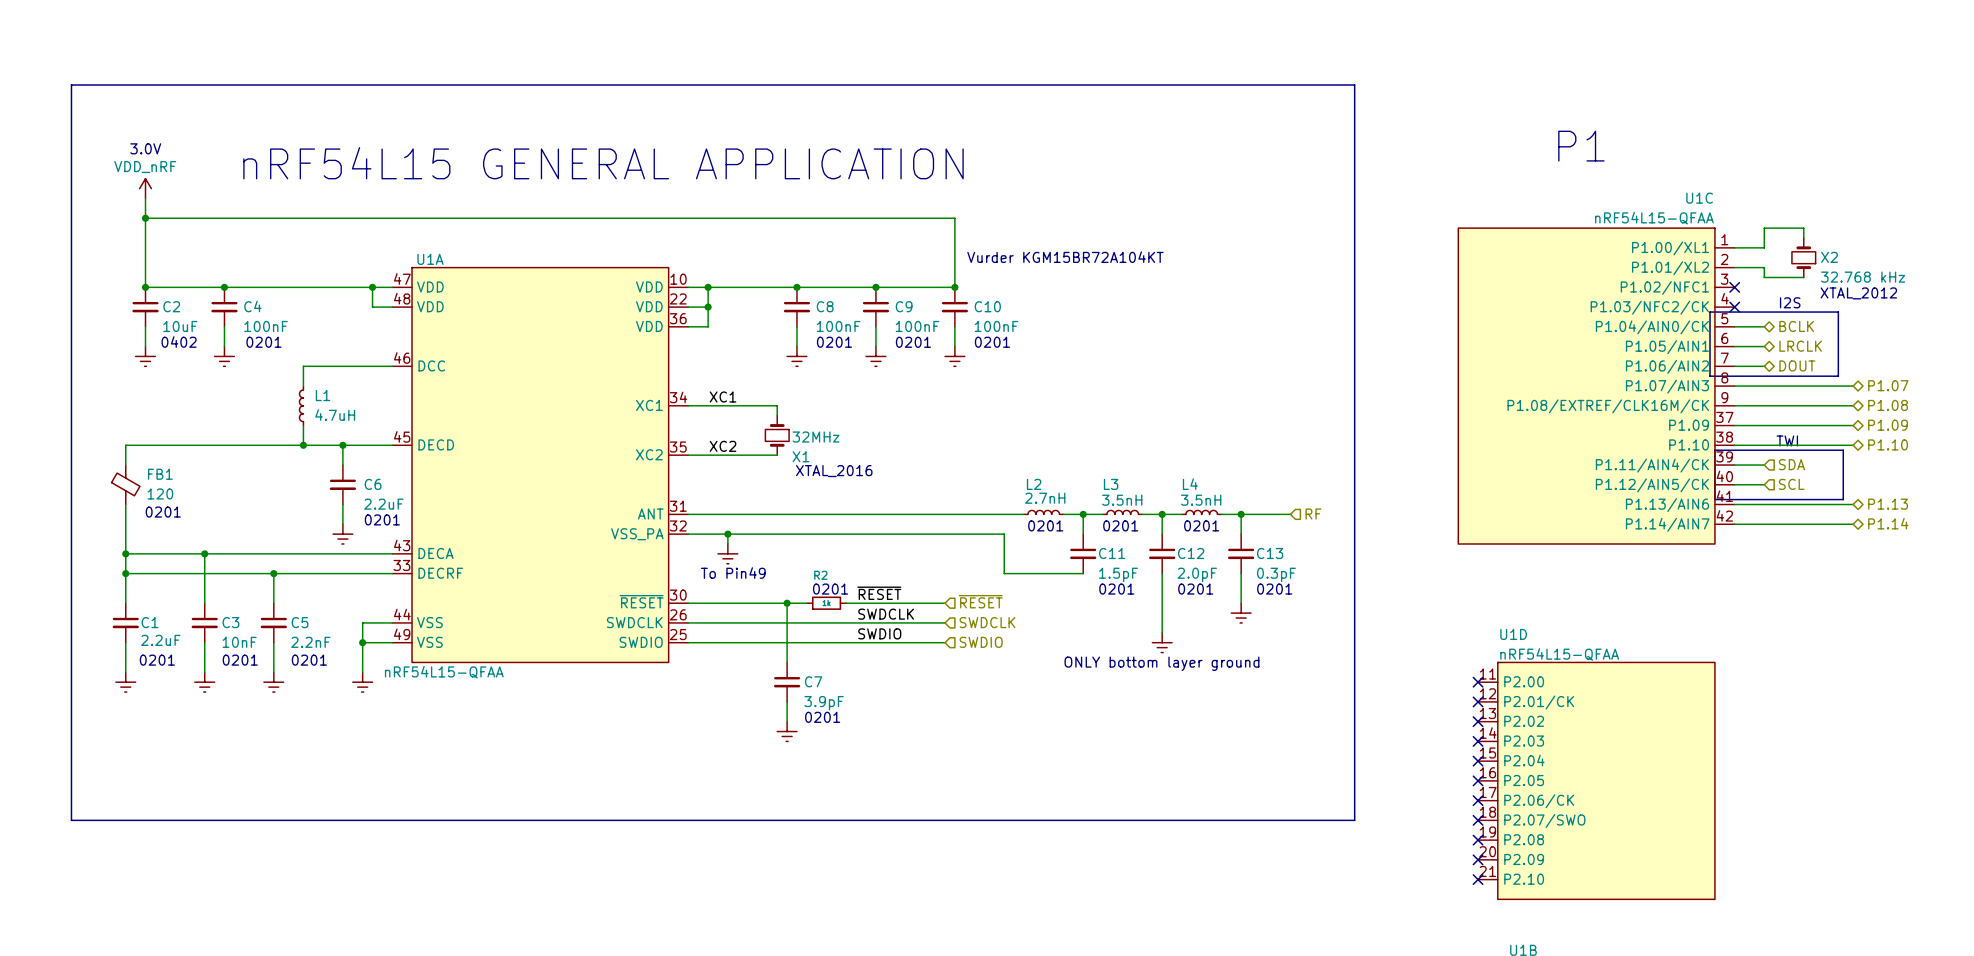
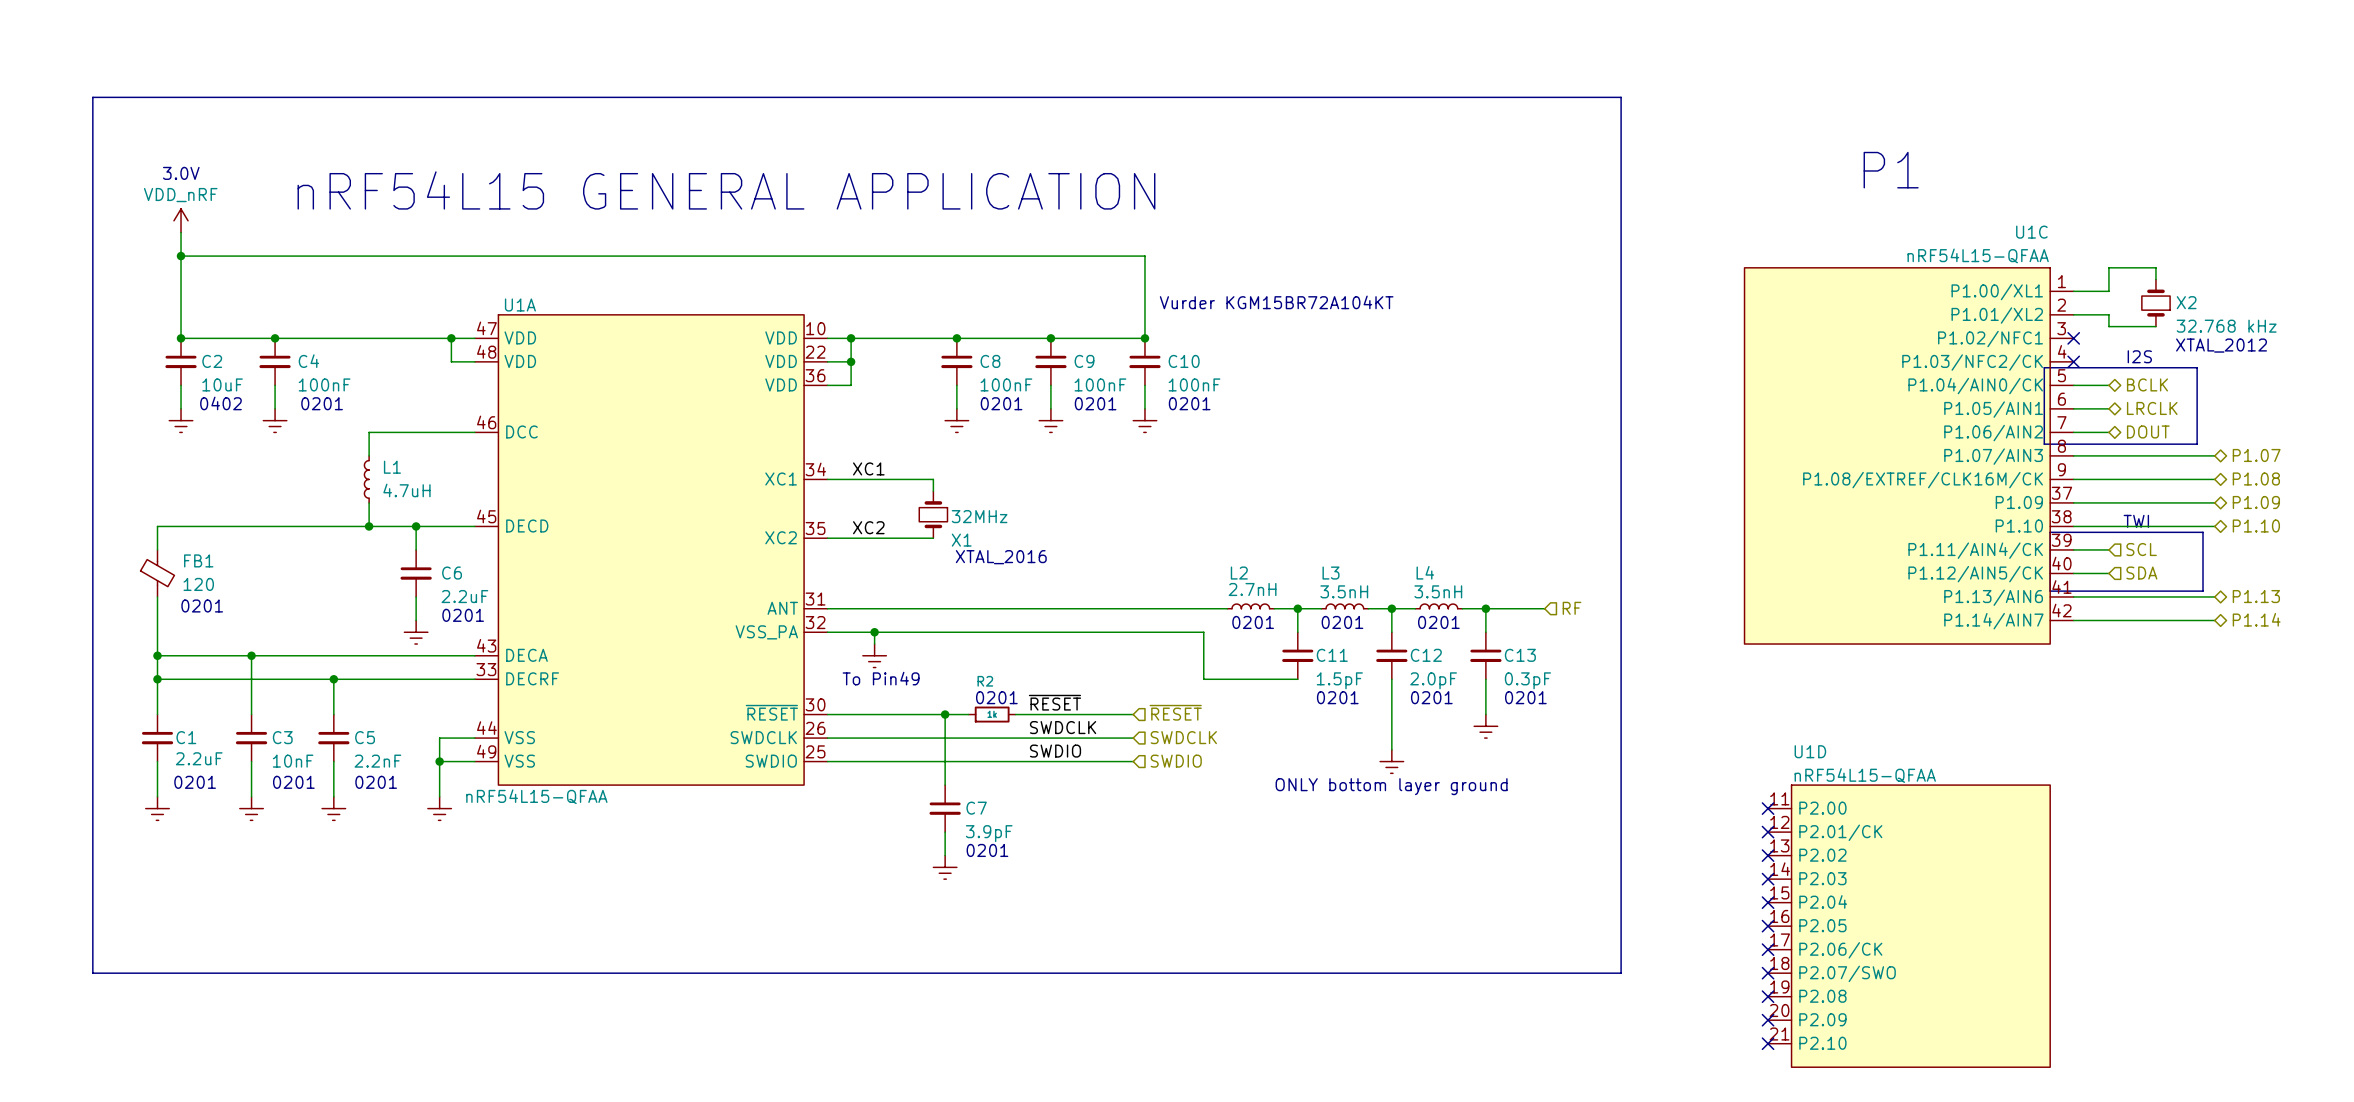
hierarchical label: SDA (1791, 464) -> SCL (2141, 549)
hierarchical label: SCL (1791, 484) -> SDA (2141, 573)

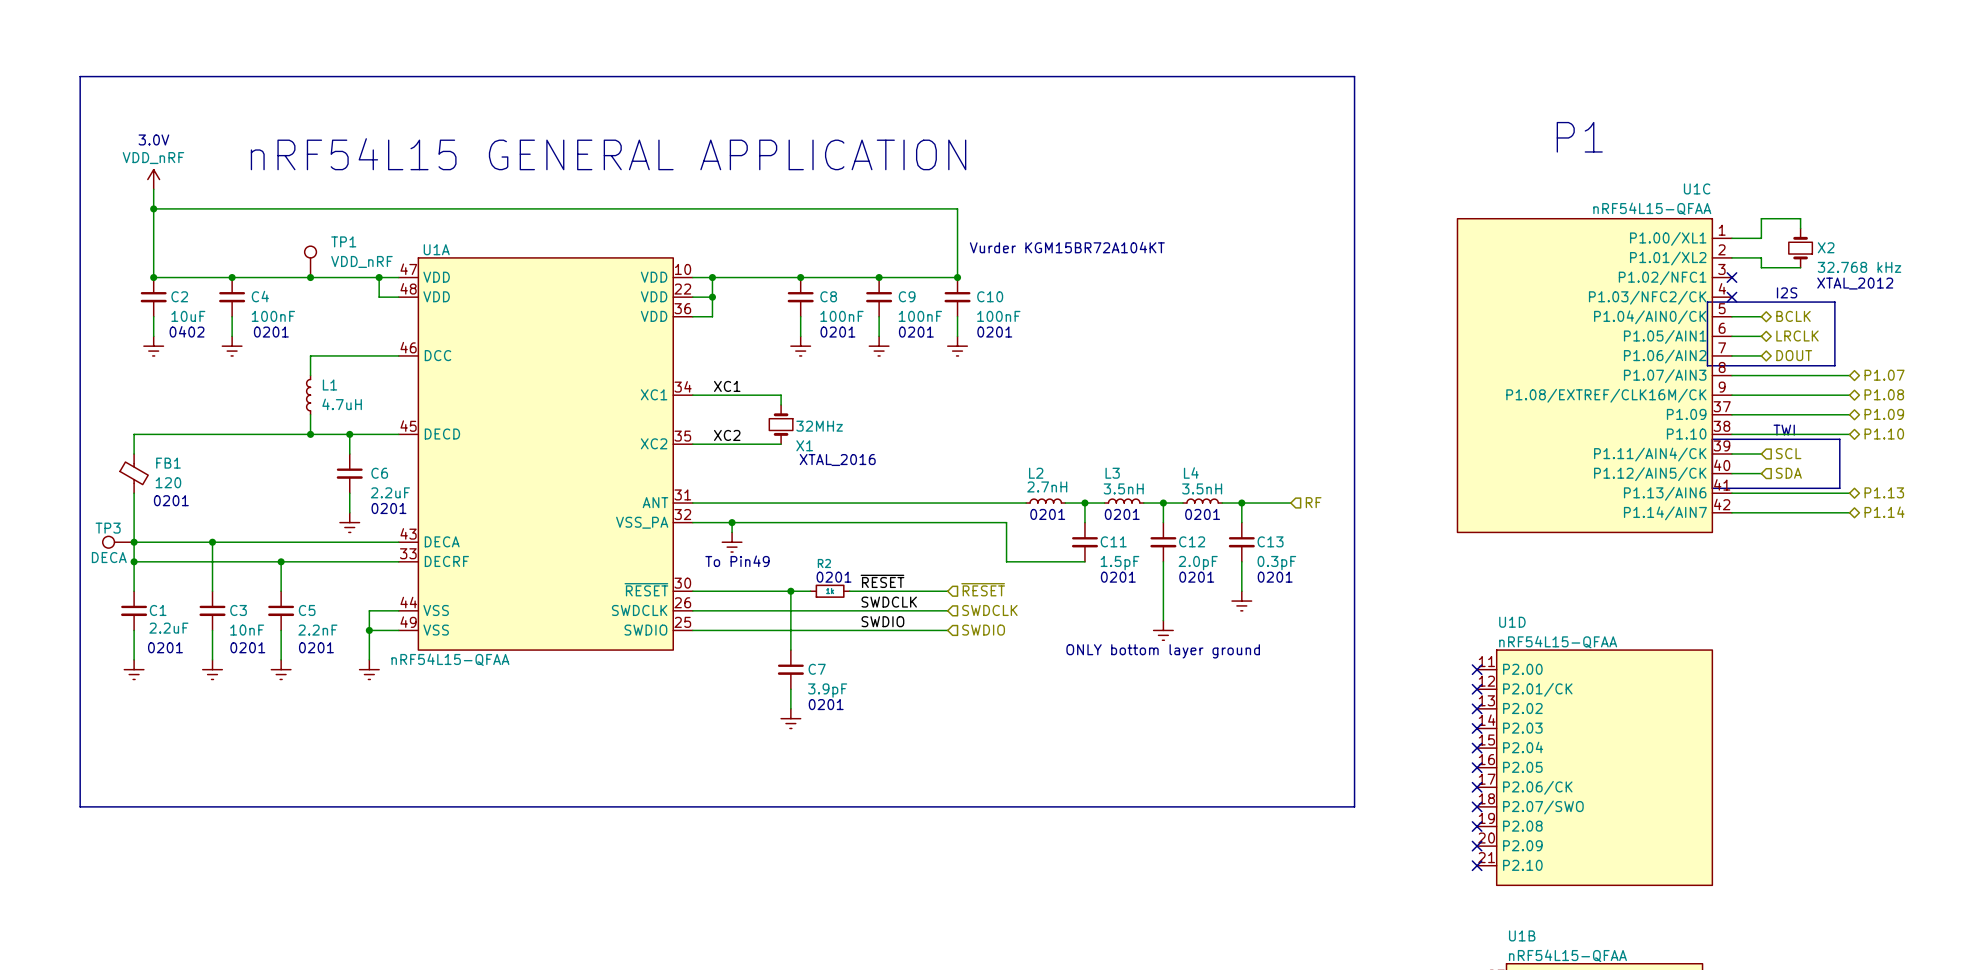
TP1: none -> VDD_nRF (310, 261)
junction: none -> (310, 277)
TP3: none -> DECA (118, 542)

